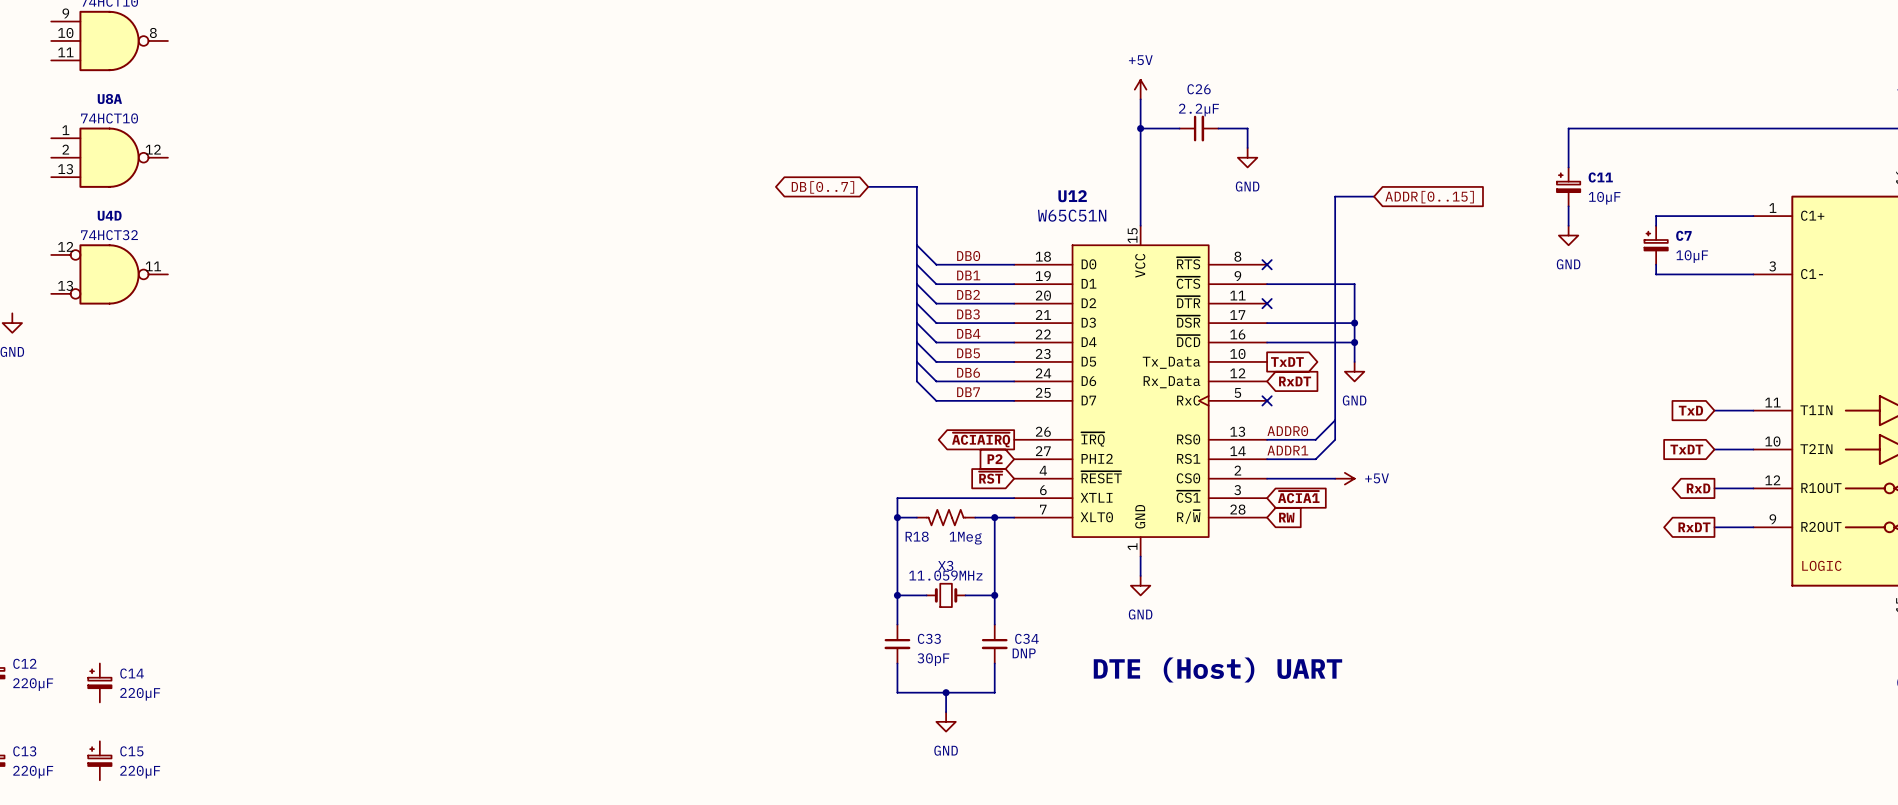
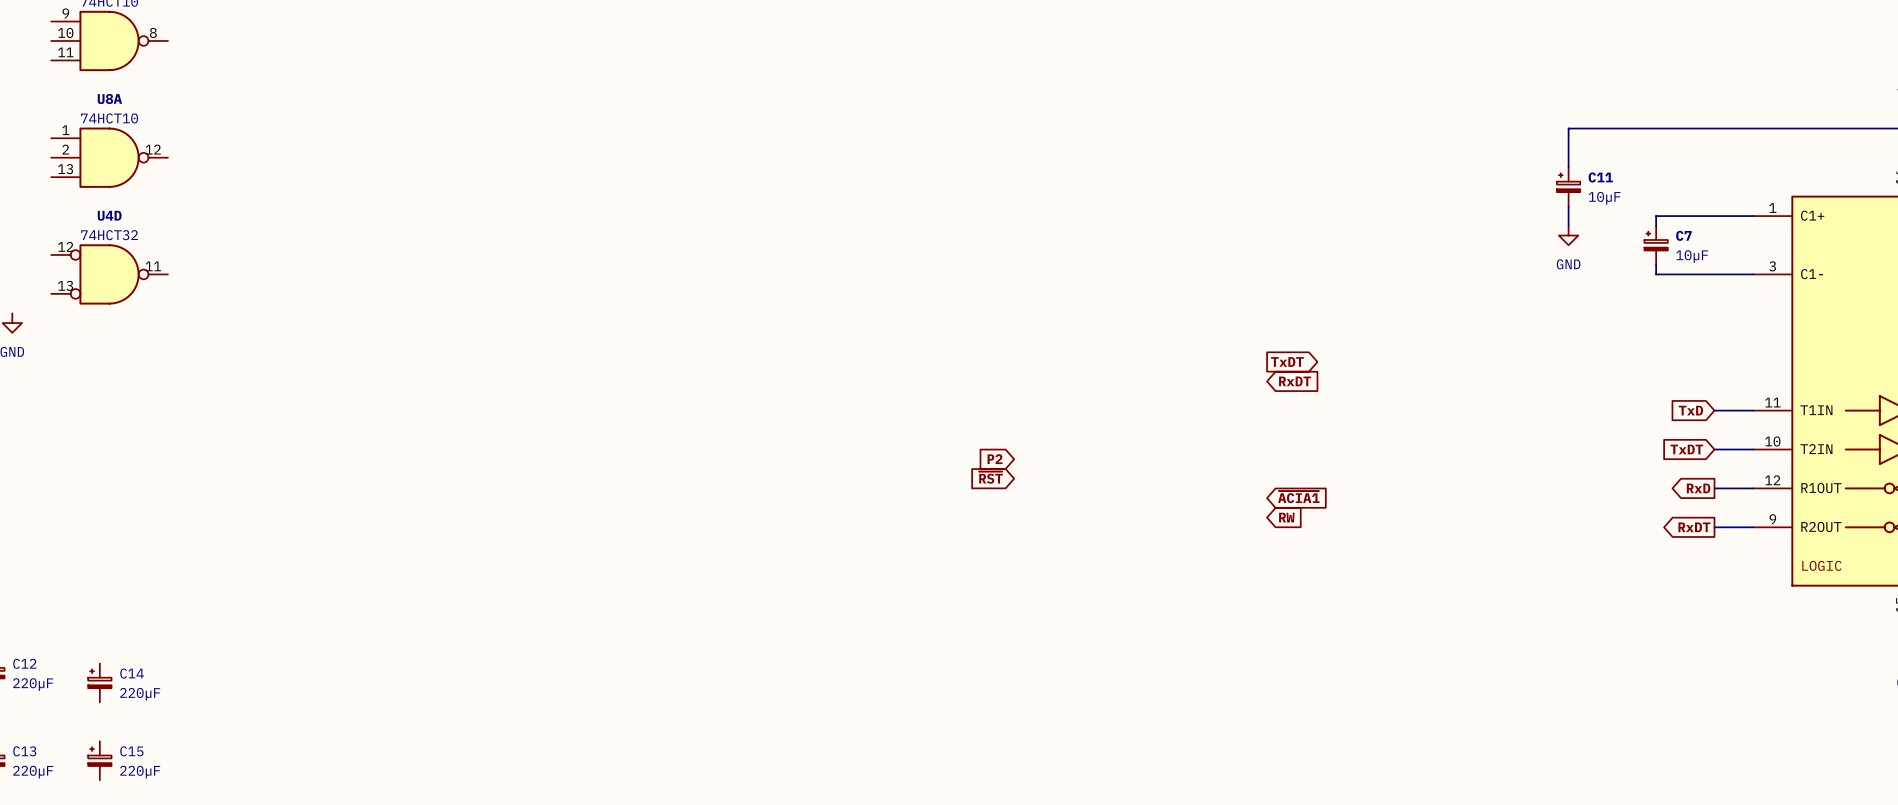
power symbol: +5V (1140, 89) -> none
wire: (1140, 99) (1140, 225) -> none
wire: (1140, 128) (1179, 128) -> none
junction: (1140, 128) -> none
C26: 2.2µF (1198, 128) -> none
wire: (1218, 128) (1247, 128) (1247, 147) -> none
power symbol: GND (1247, 157) -> none
bus: (868, 186) (916, 186) (916, 381) -> none
global label: DB[0..7] (822, 187) -> none
bus: (1374, 196) (1335, 196) (1335, 439) -> none
global label: ADDR[0..15] (1429, 197) -> none
wire: (916, 245) (936, 264) (1014, 264) -> none
label: DB0 (968, 256) -> none
wire: (916, 264) (936, 284) (1014, 284) -> none
no-connect mark: (1267, 264) -> none
label: DB1 (968, 275) -> none
wire: (916, 284) (936, 303) (1014, 303) -> none
wire: (1267, 284) (1354, 284) (1354, 361) -> none
label: DB2 (968, 294) -> none
wire: (916, 303) (936, 323) (1014, 323) -> none
no-connect mark: (1267, 303) -> none
label: DB3 (968, 314) -> none
wire: (916, 323) (936, 342) (1014, 342) -> none
wire: (1267, 323) (1354, 323) -> none
junction: (1354, 323) -> none
label: DB4 (968, 333) -> none
wire: (916, 342) (936, 361) (1014, 361) -> none
wire: (1267, 342) (1354, 342) -> none
junction: (1354, 342) -> none
label: DB5 (968, 353) -> none
wire: (916, 361) (936, 381) (1014, 381) -> none
power symbol: GND (1354, 371) -> none
label: DB6 (968, 372) -> none
wire: (916, 381) (936, 400) (1014, 400) -> none
U12: W65C51N (1140, 391) -> none
label: DB7 (968, 392) -> none
no-connect mark: (1267, 400) -> none
wire: (1335, 420) (1315, 439) (1267, 439) -> none
label: ADDR0 (1287, 431) -> none
wire: (1335, 439) (1315, 459) (1267, 459) -> none
global label: ~{ACIAIRQ} (981, 440) -> none
label: ADDR1 (1287, 450) -> none
wire: (1267, 478) (1335, 478) -> none
power symbol: +5V (1344, 478) -> none
wire: (1014, 498) (897, 498) (897, 624) -> none
wire: (897, 517) (916, 517) -> none
junction: (897, 517) -> none
R18: 1Meg (946, 517) -> none
wire: (975, 517) (1014, 517) -> none
wire: (994, 517) (994, 624) -> none
junction: (994, 517) -> none
wire: (1140, 556) (1140, 575) -> none
power symbol: GND (1140, 585) -> none
wire: (897, 595) (926, 595) -> none
junction: (897, 595) -> none
X3: 11.059MHz (946, 595) -> none
wire: (965, 595) (994, 595) -> none
junction: (994, 595) -> none
C33: 30pF (897, 644) -> none
C34: (994, 644) -> none
wire: (897, 663) (897, 692) (994, 692) (994, 663) -> none
text: DTE (Host) UART (1217, 669) -> none
wire: (946, 692) (946, 712) -> none
junction: (946, 692) -> none
power symbol: GND (946, 721) -> none

